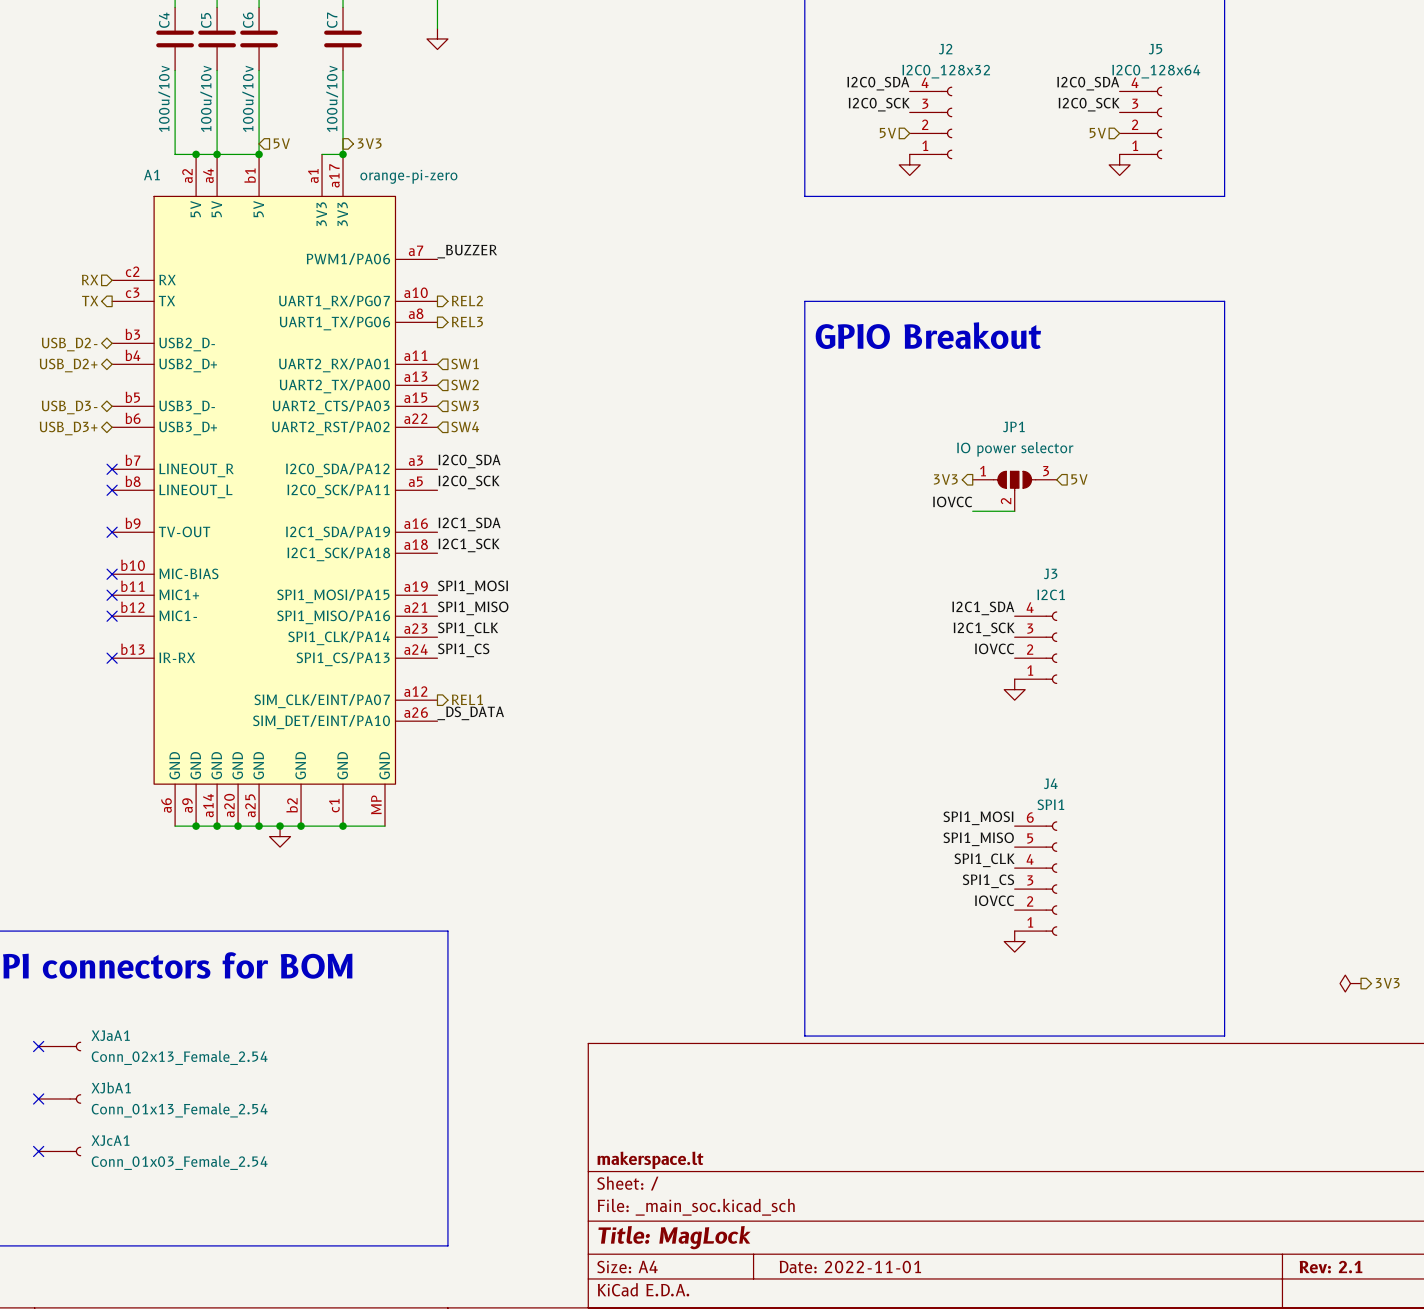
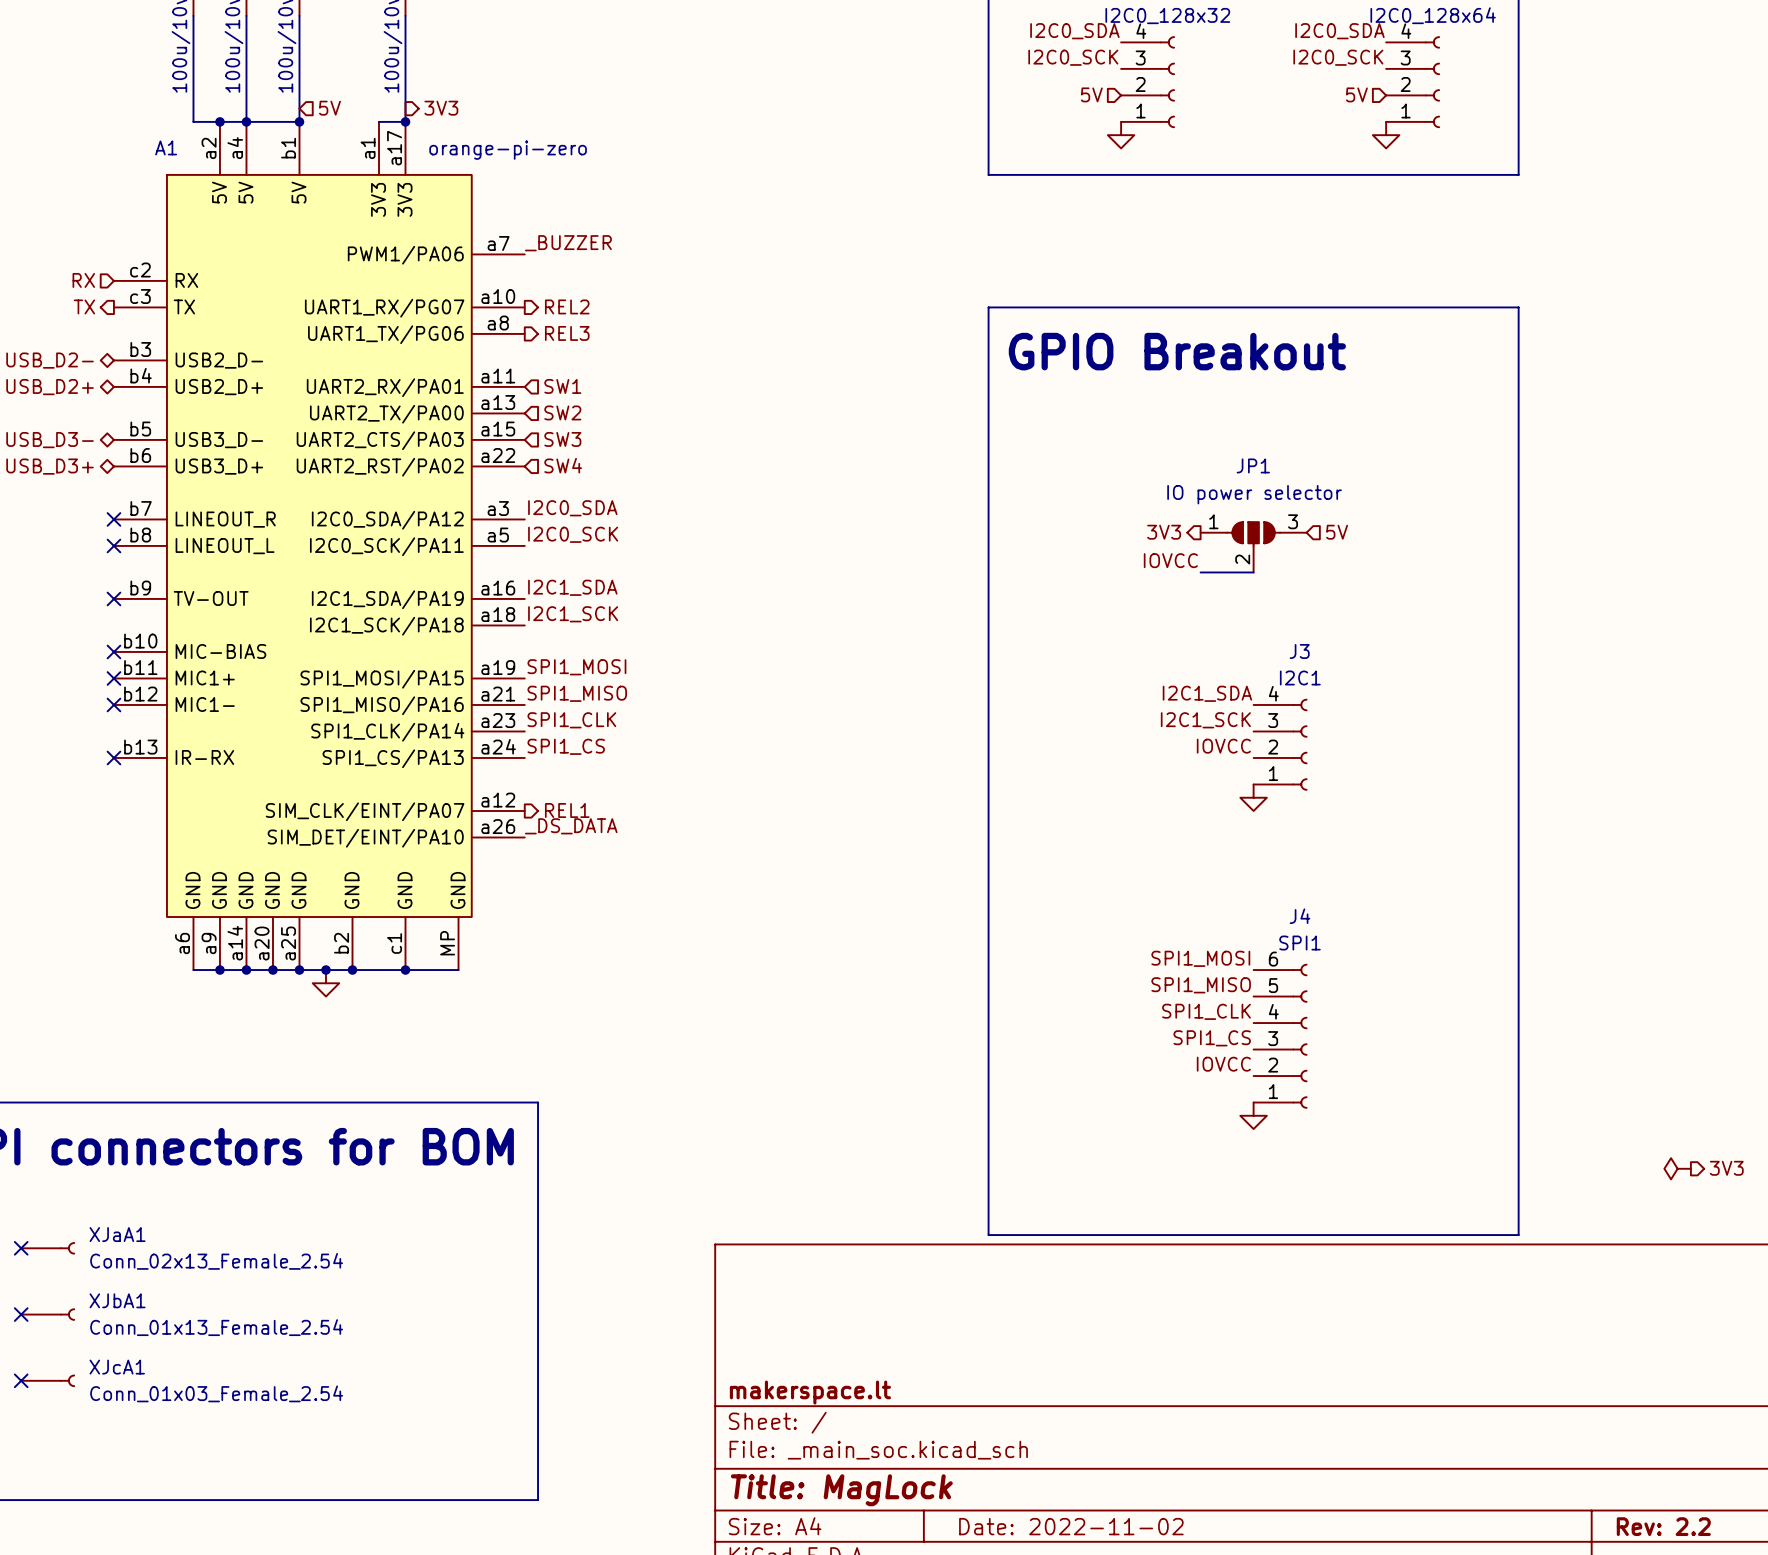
title block: Date: 2022-11-01 (850, 1267) -> Date: 2022-11-02 (1071, 1526)
title block: Rev: 2.1 (1331, 1267) -> Rev: 2.2 (1663, 1526)

